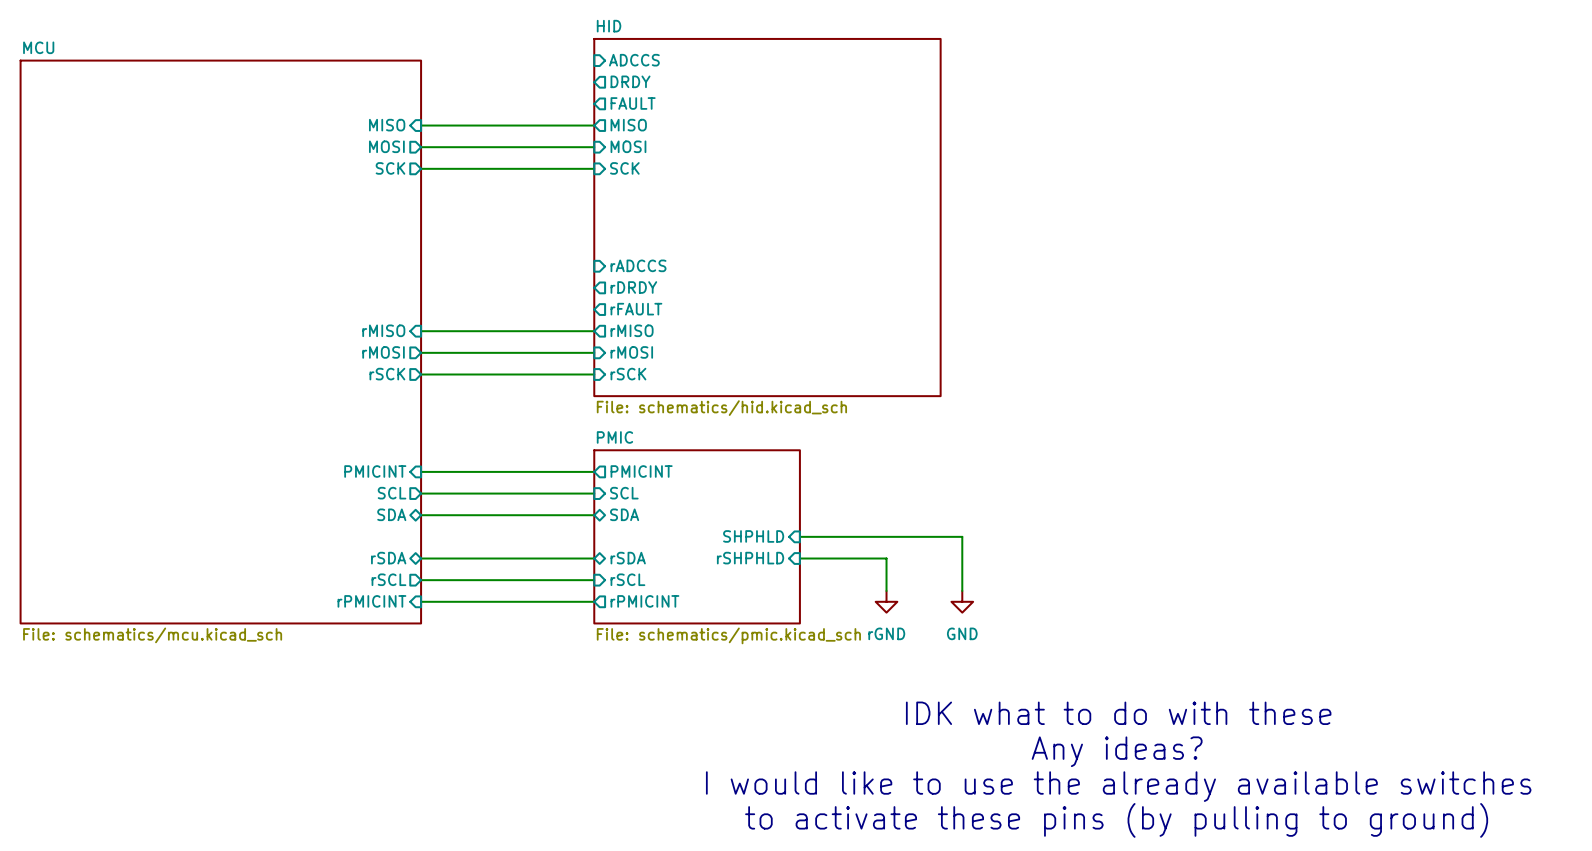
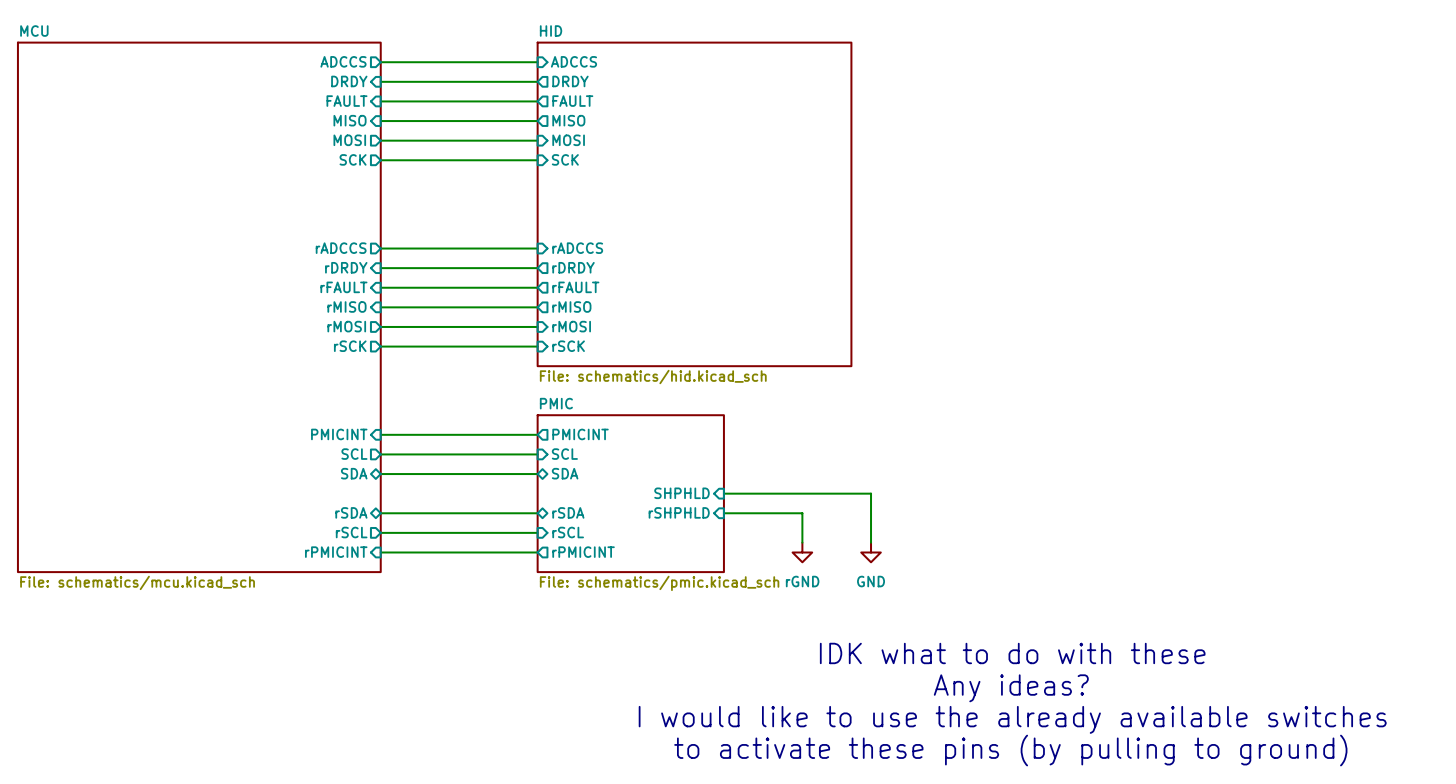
sheet pin: none -> ADCCS (343, 61)
wire: none -> (380, 62) (537, 62)
sheet pin: none -> DRDY (349, 81)
wire: none -> (380, 81) (537, 81)
sheet pin: none -> FAULT (346, 101)
wire: none -> (380, 101) (537, 101)
sheet pin: none -> rADCCS (341, 248)
wire: none -> (380, 248) (537, 248)
sheet pin: none -> rDRDY (346, 267)
wire: none -> (380, 268) (537, 268)
sheet pin: none -> rFAULT (343, 287)
wire: none -> (380, 287) (537, 287)
sheet MCU: none -> File: schematics/mcu.kicad_sch (199, 307)
sheet MCU: File: schematics/mcu.kicad_sch (220, 342) -> none

